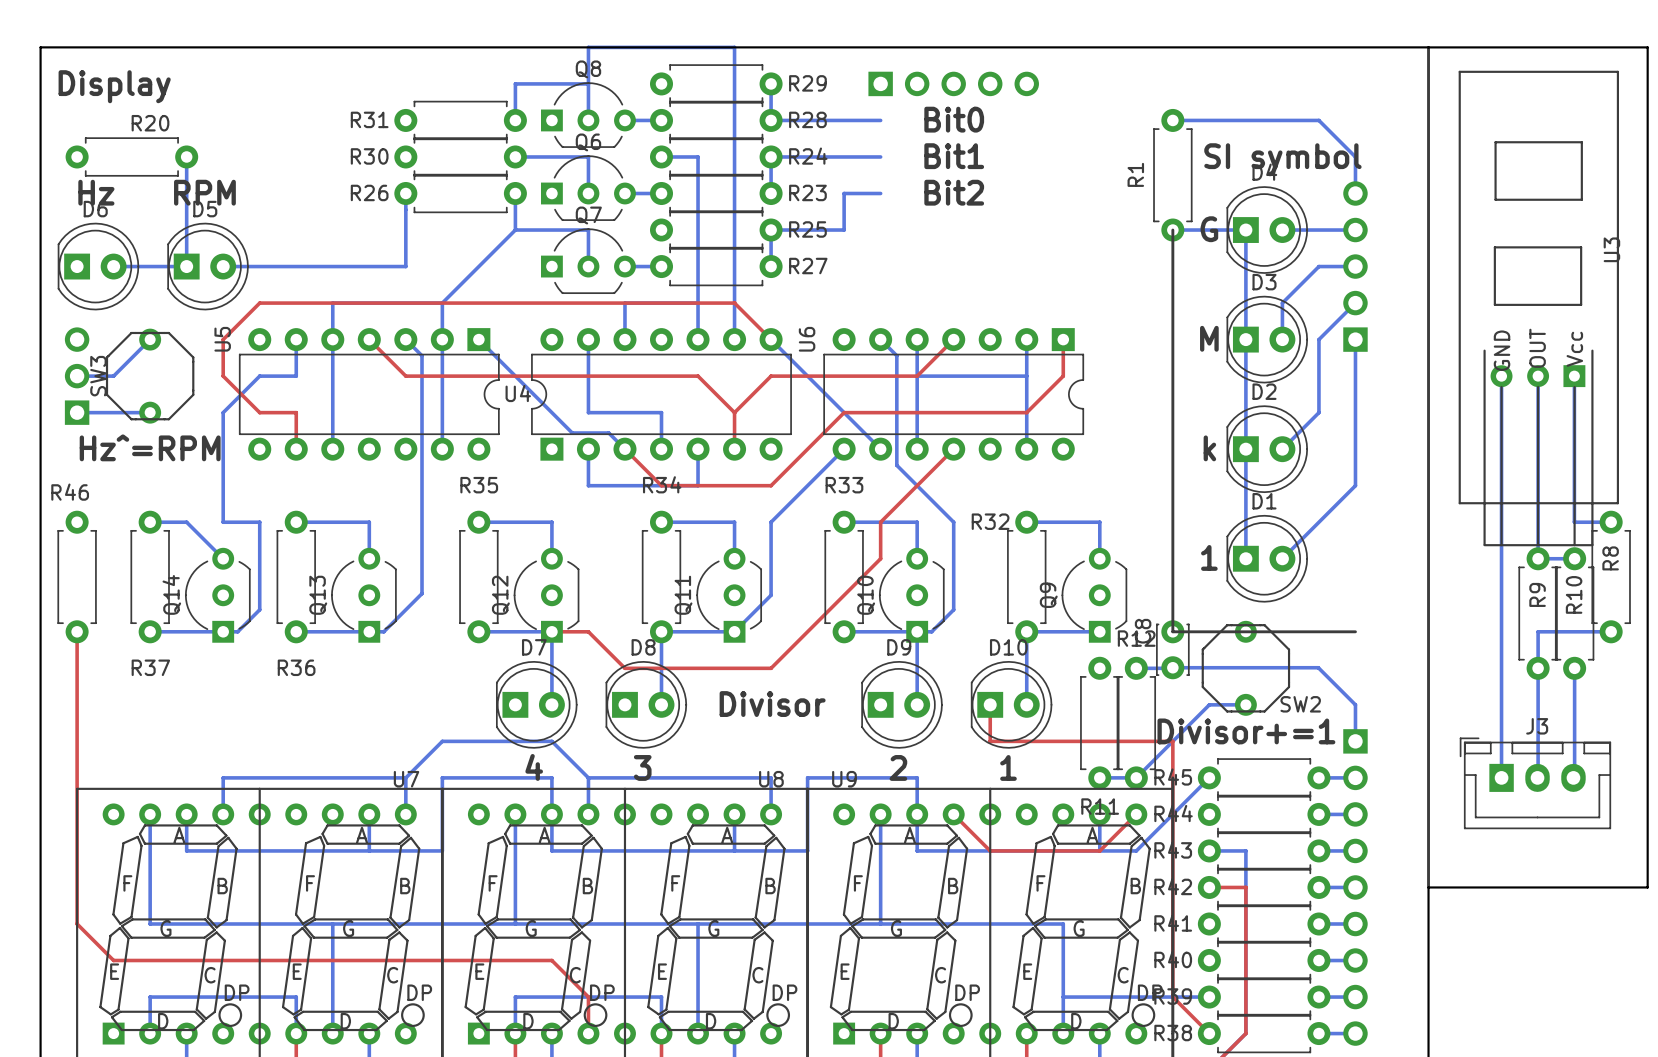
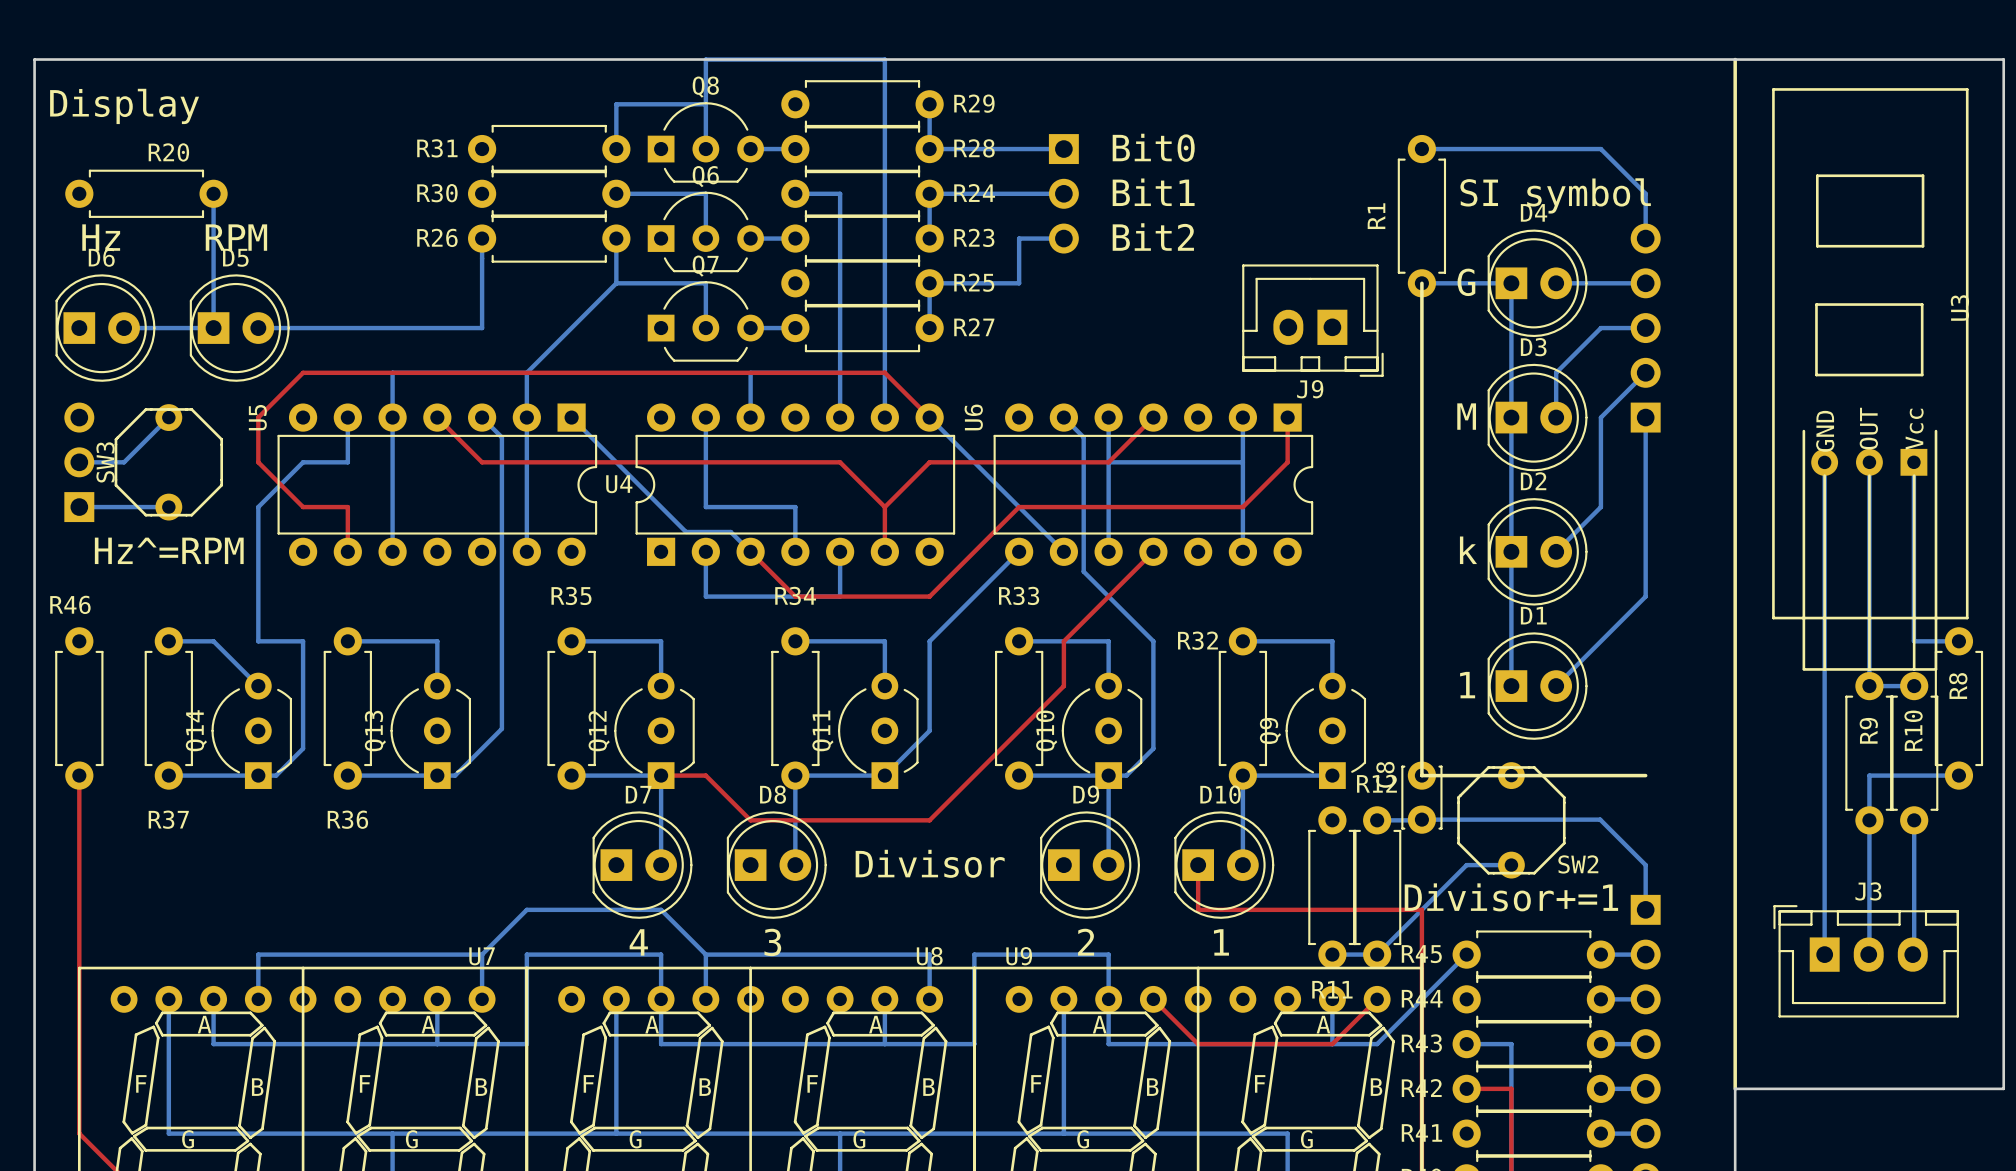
part: (953, 83) -> none
part: none -> (1063, 193)
J9: none -> (1312, 320)

